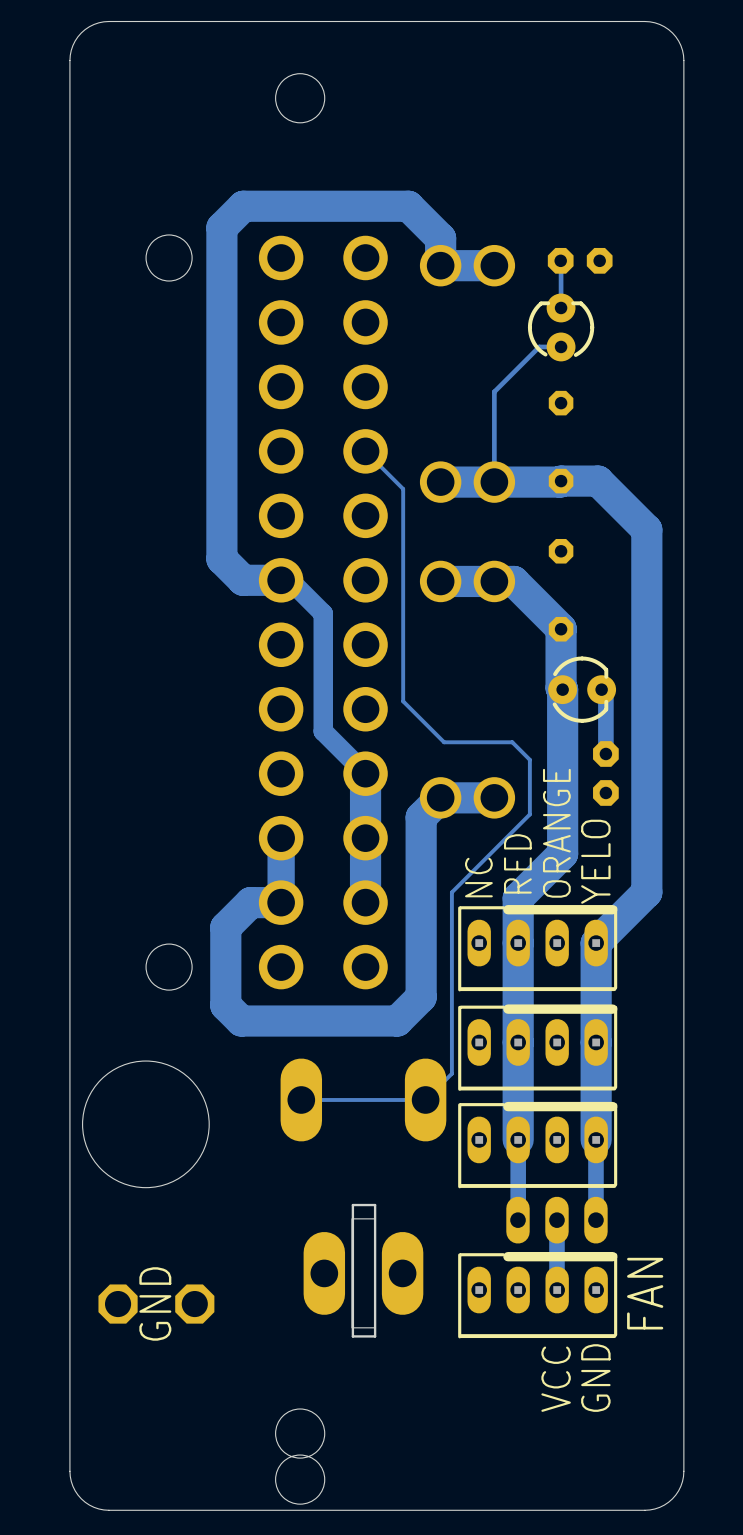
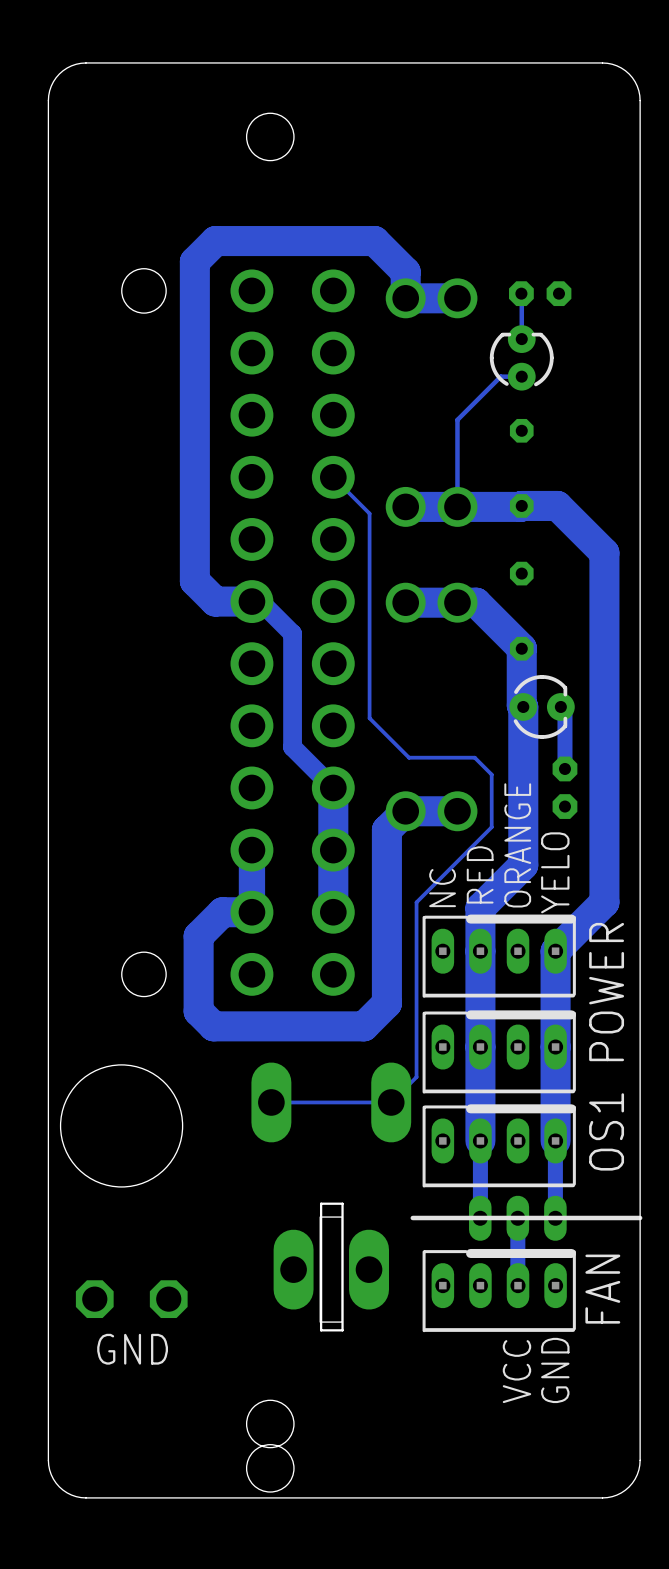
text: none -> OS1 POWER (606, 1046)
line: none -> (640, 1217) (412, 1217)
text rotation: 0° (155, 1303) -> 90° clockwise (132, 1349)

